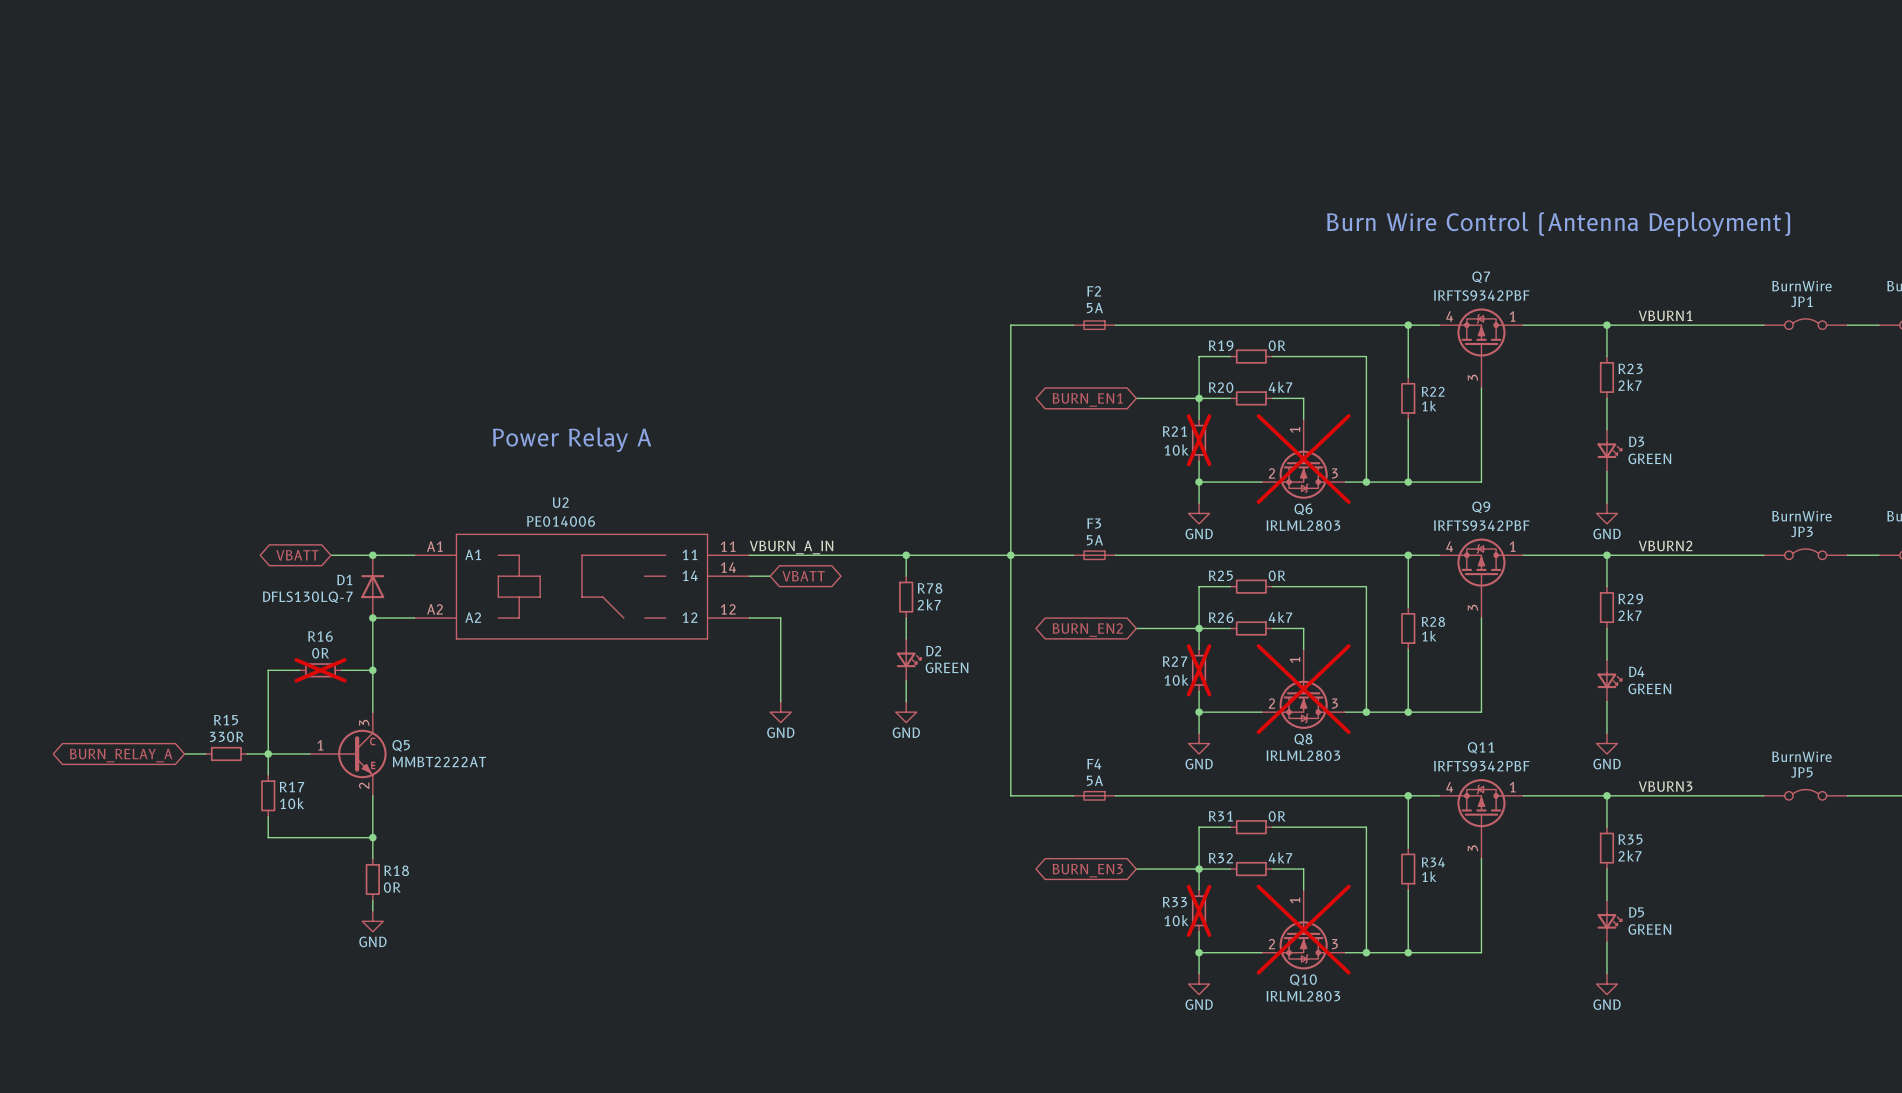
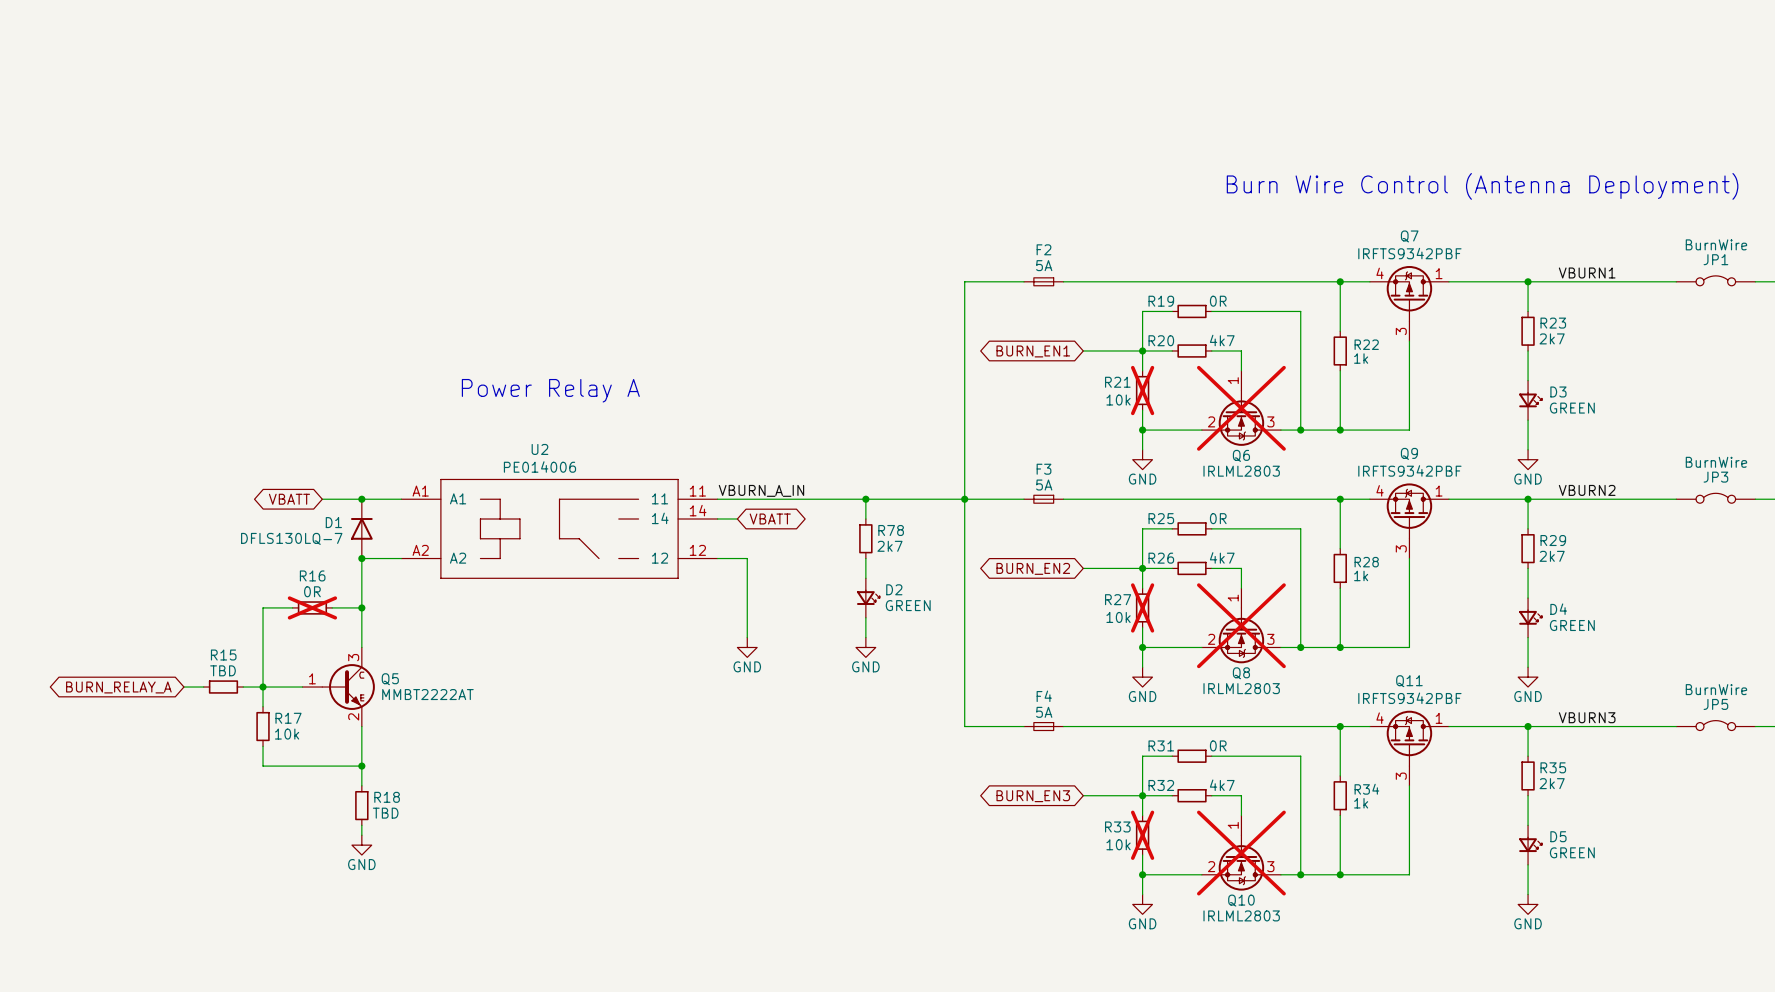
R15 value: 330R (226, 736) -> TBD (223, 670)
R18 value: 0R (392, 887) -> TBD (385, 813)

